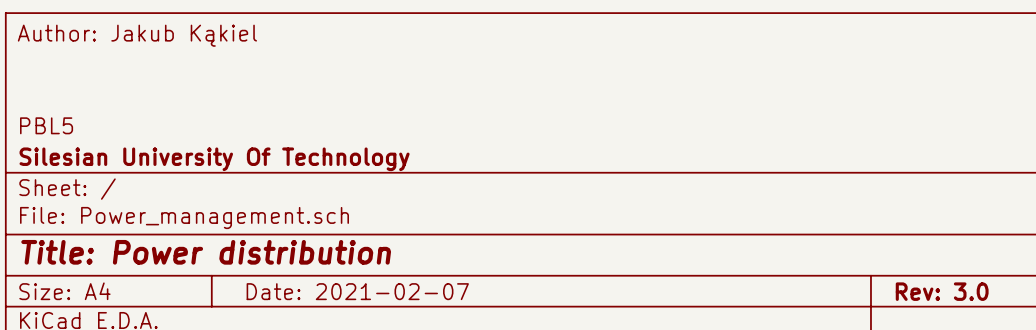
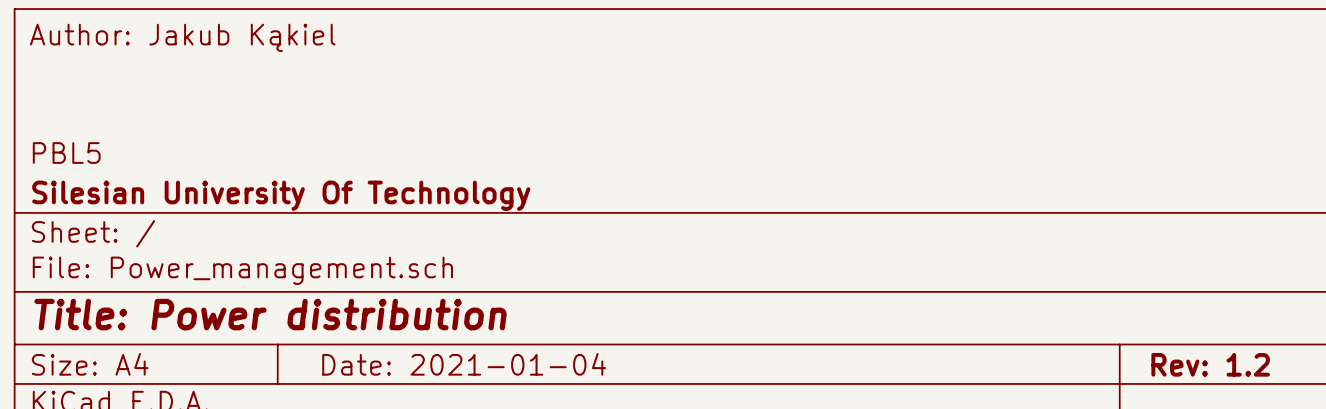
title block: Date: 2021-02-07 (357, 291) -> Date: 2021-01-04 (464, 364)
title block: Rev: 3.0 (942, 291) -> Rev: 1.2 (1210, 364)

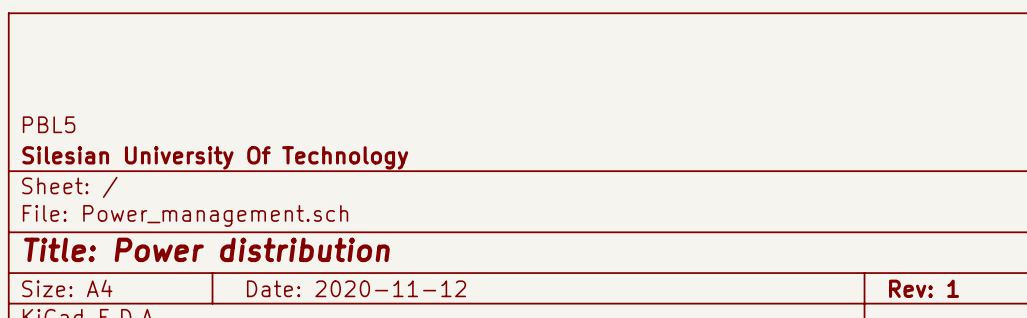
title block: Author: Jakub Kąkiel (182, 37) -> none
title block: Date: 2021-01-04 (464, 364) -> Date: 2020-11-12 (356, 288)
title block: Rev: 1.2 (1210, 364) -> Rev: 1 (924, 288)

